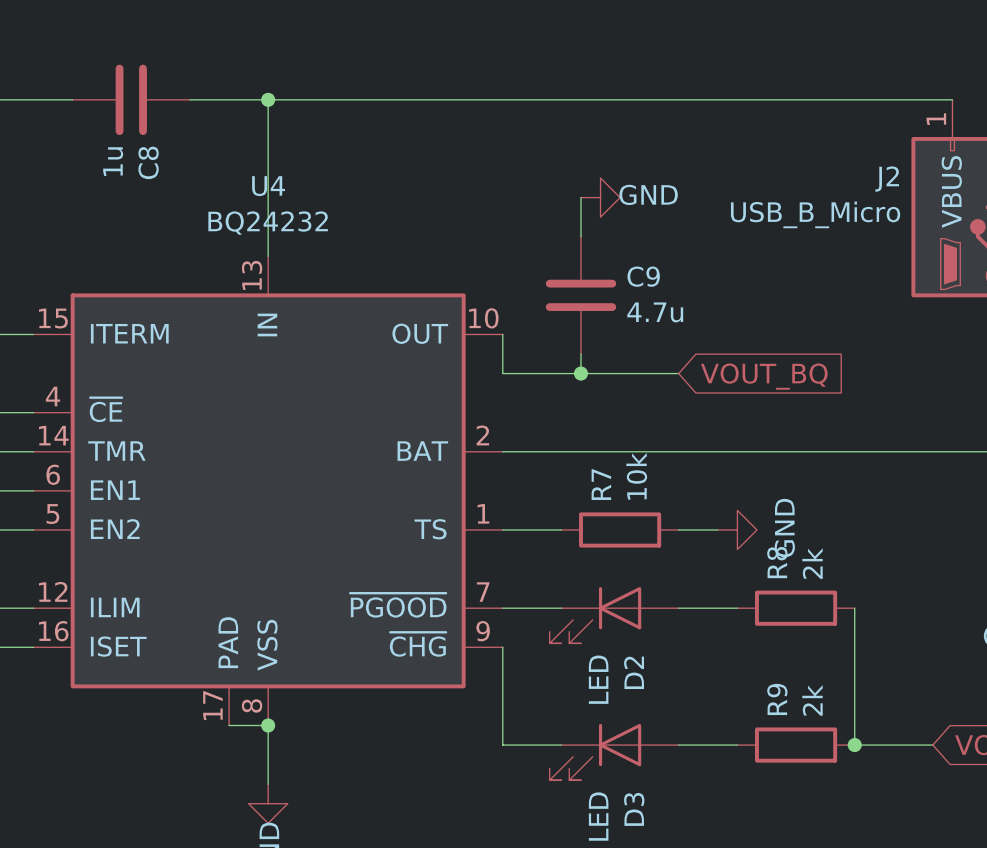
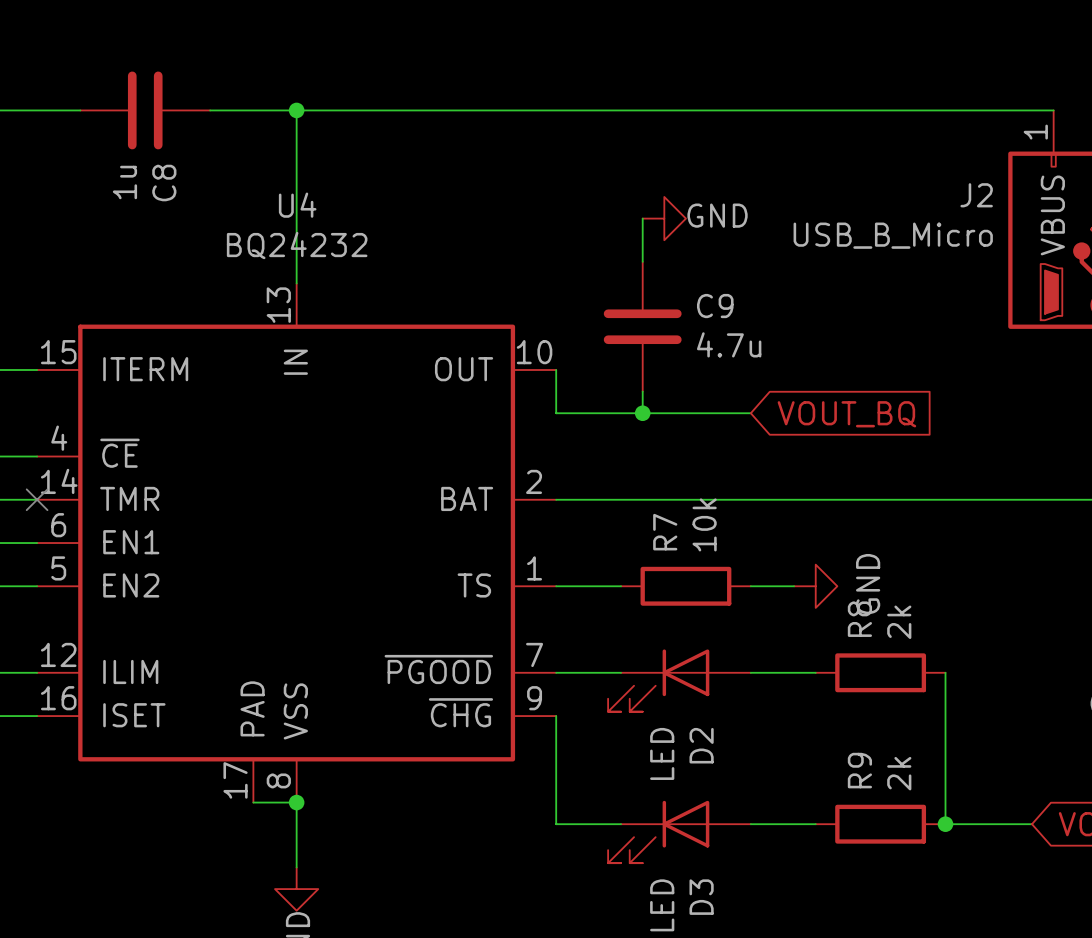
no-connect mark: none -> (37, 499)

